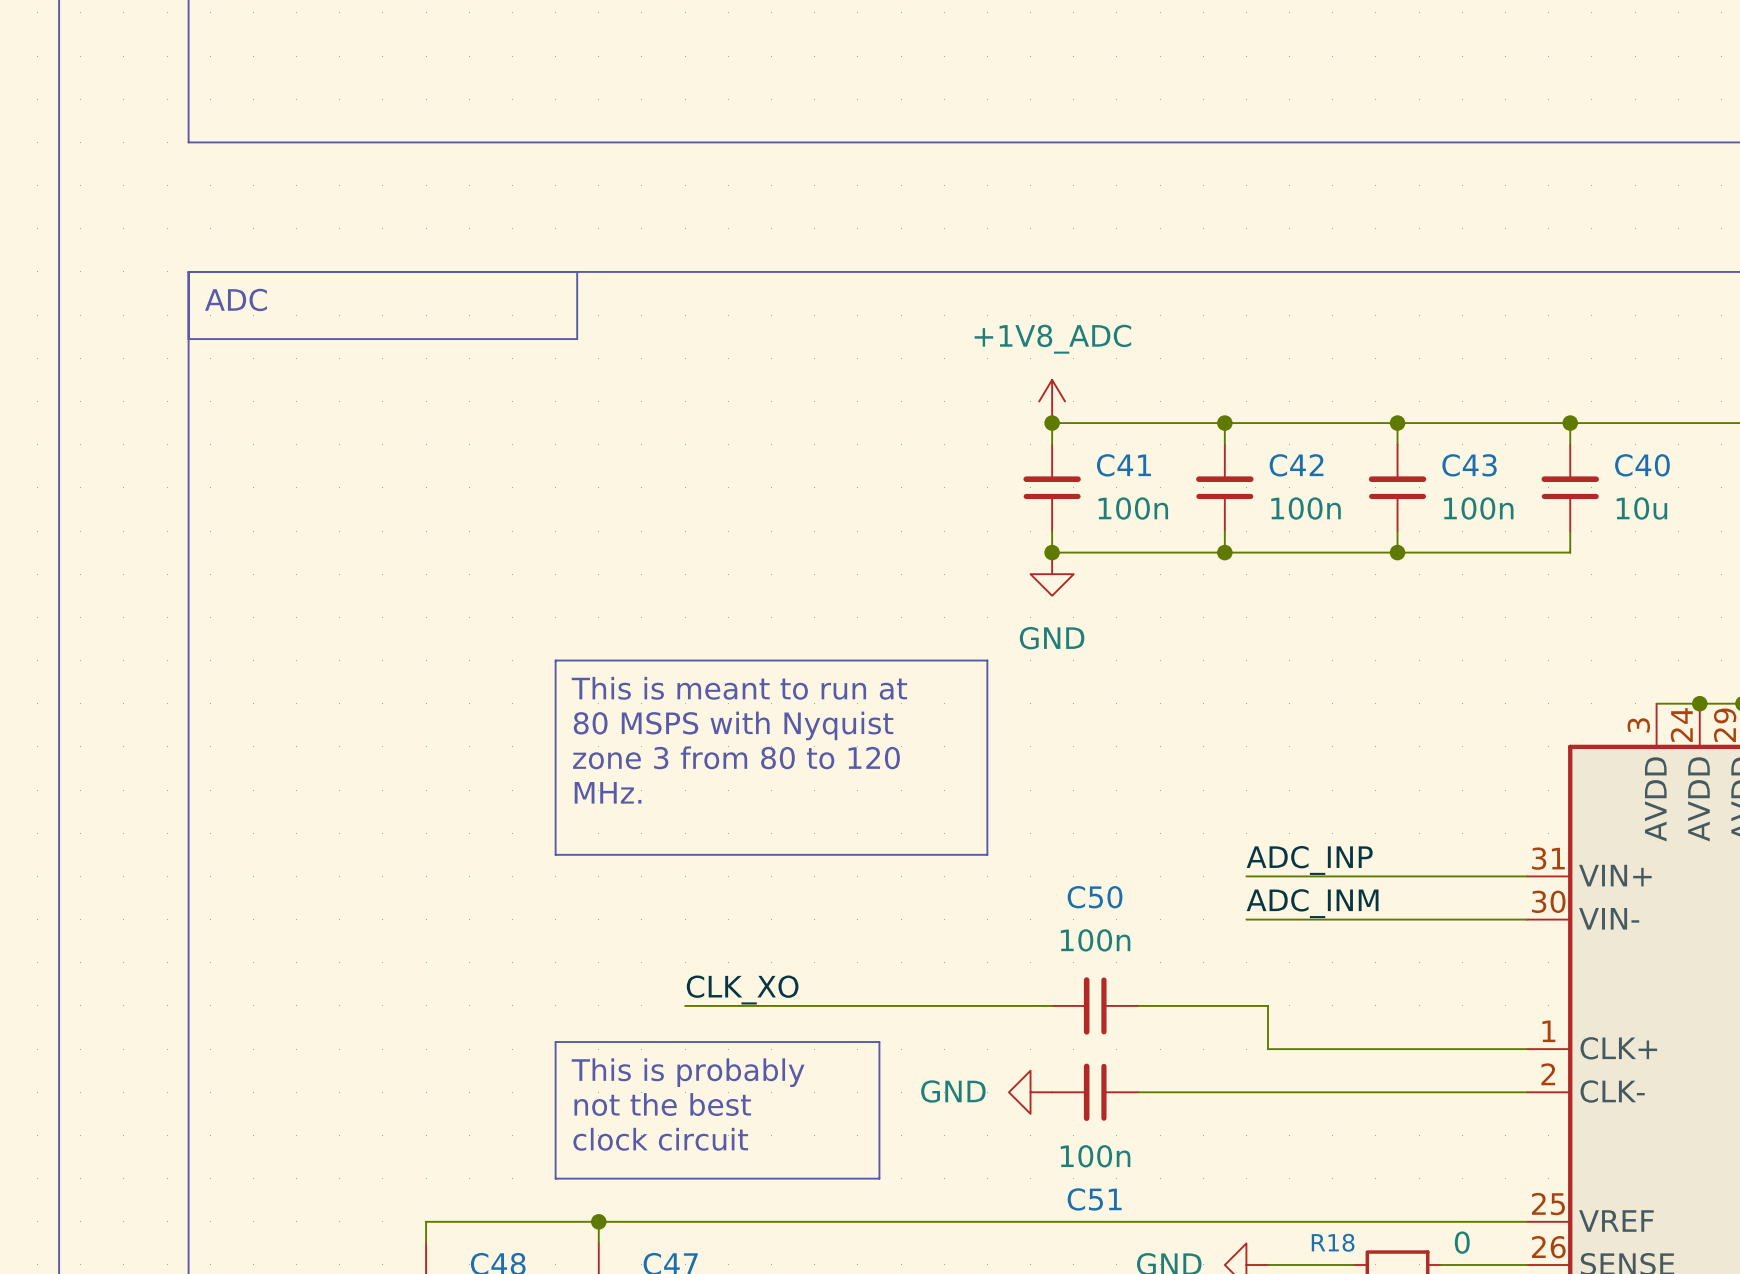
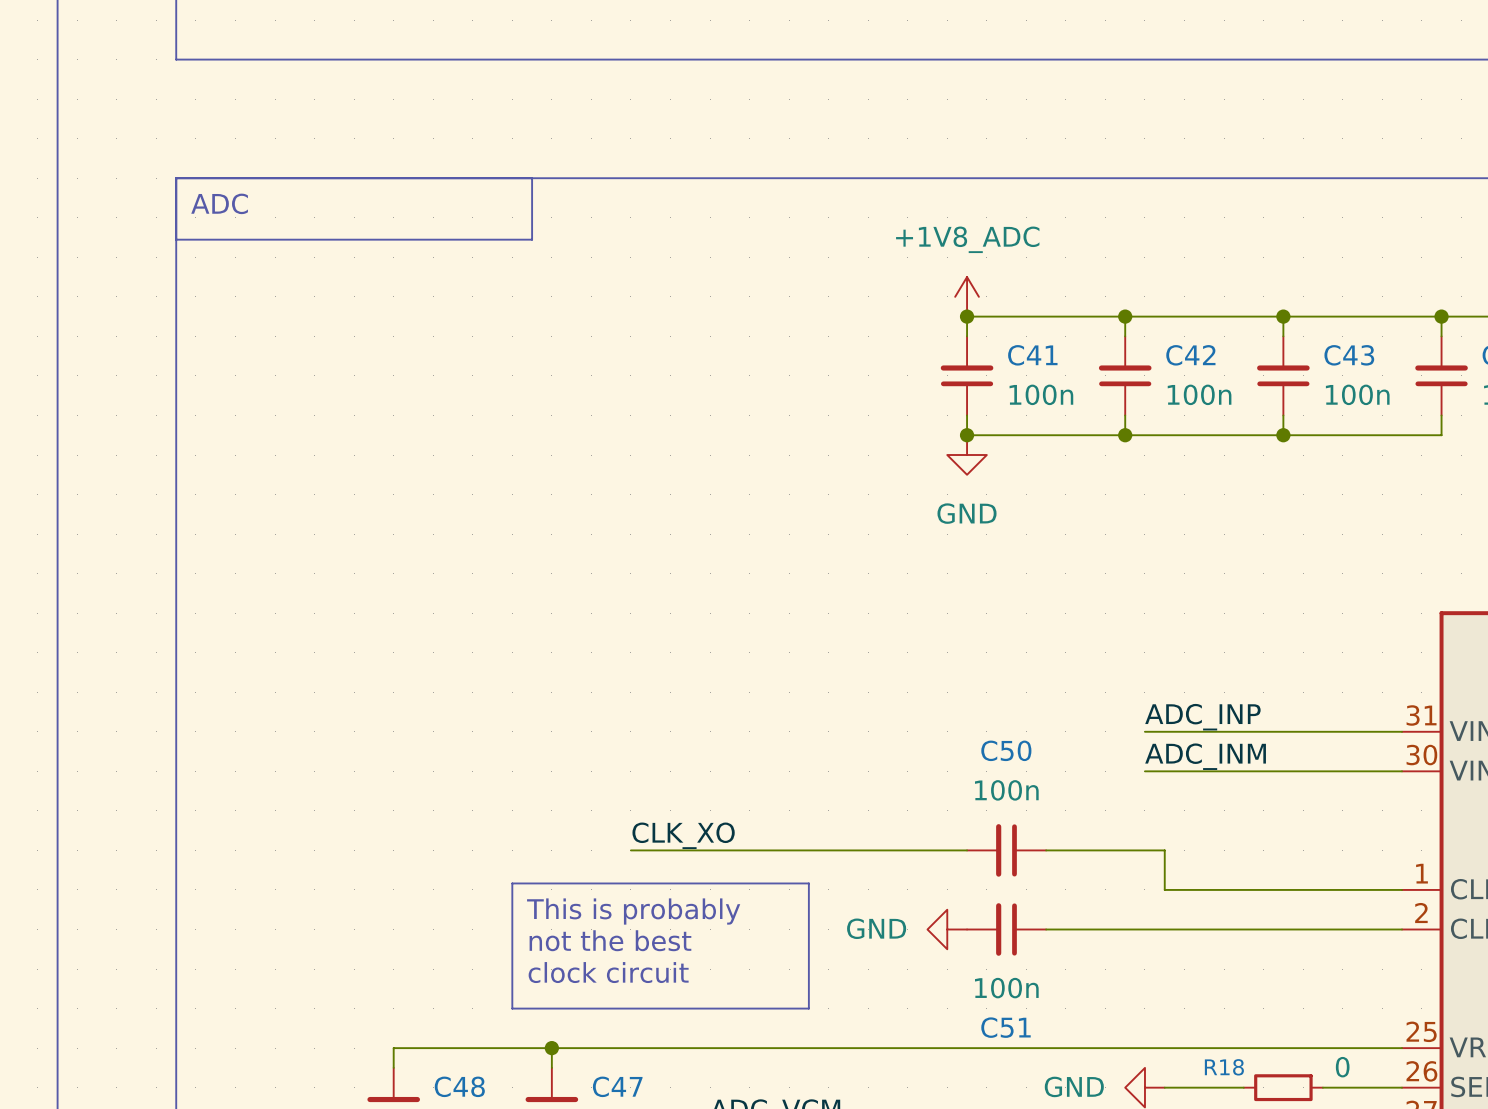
line: (555, 660) (987, 660) (987, 854) (555, 854) (555, 660) -> none
text: This is meant to run at (739, 688) -> none
text: 80 MSPS with Nyquist (733, 725) -> none
text: zone 3 from 80 to 120 (736, 757) -> none
text: MHz. (608, 792) -> none

